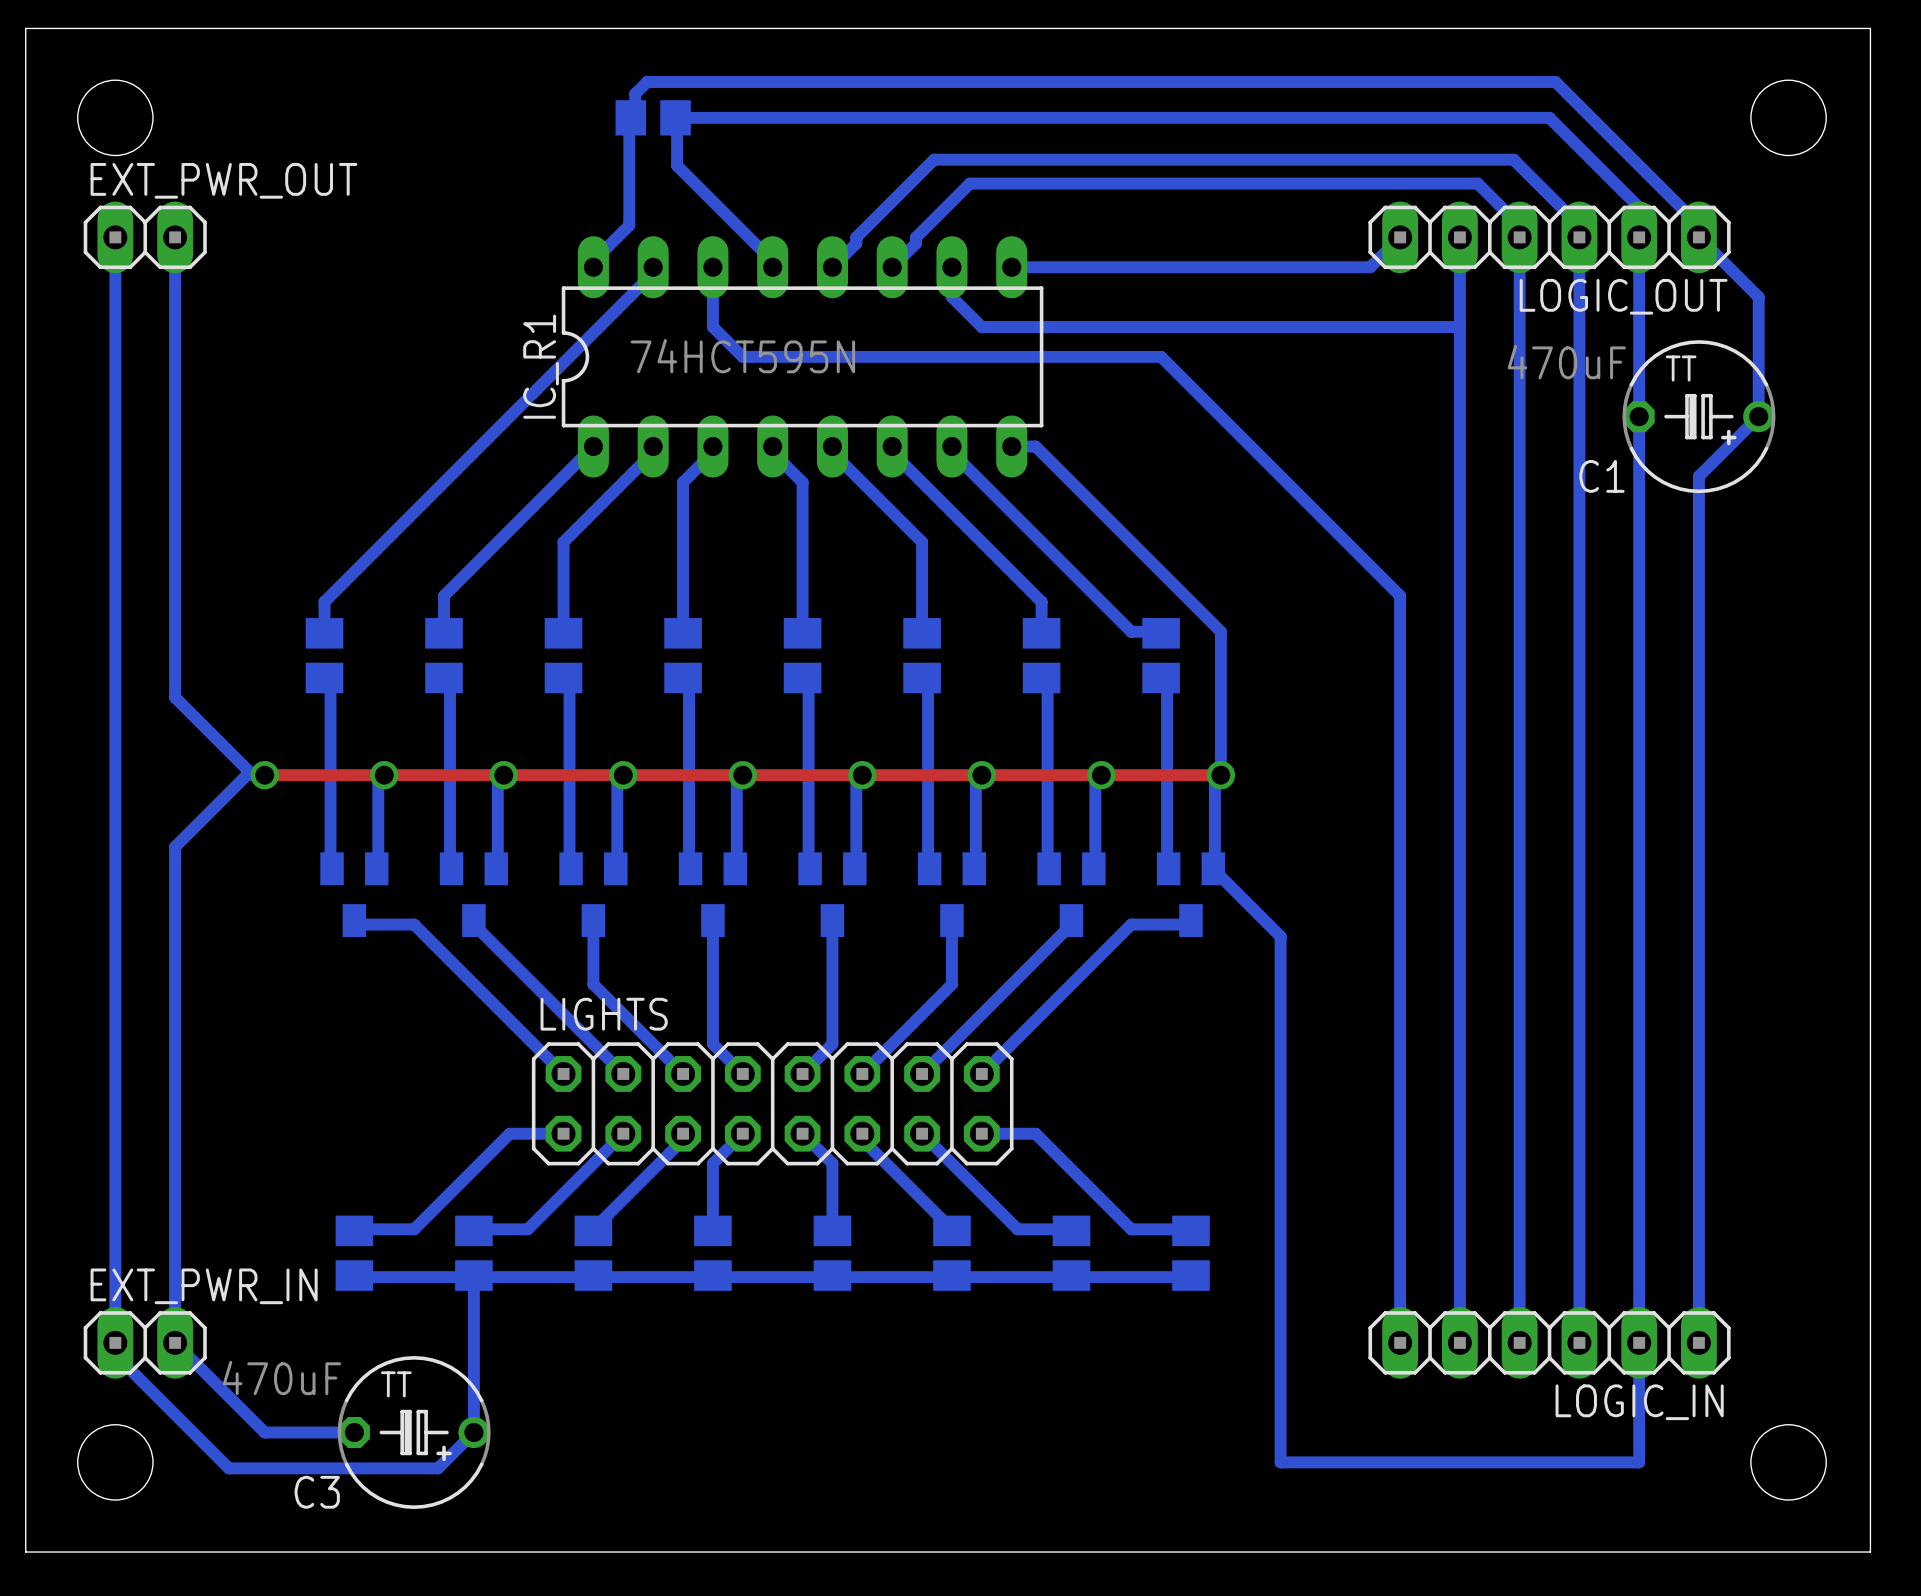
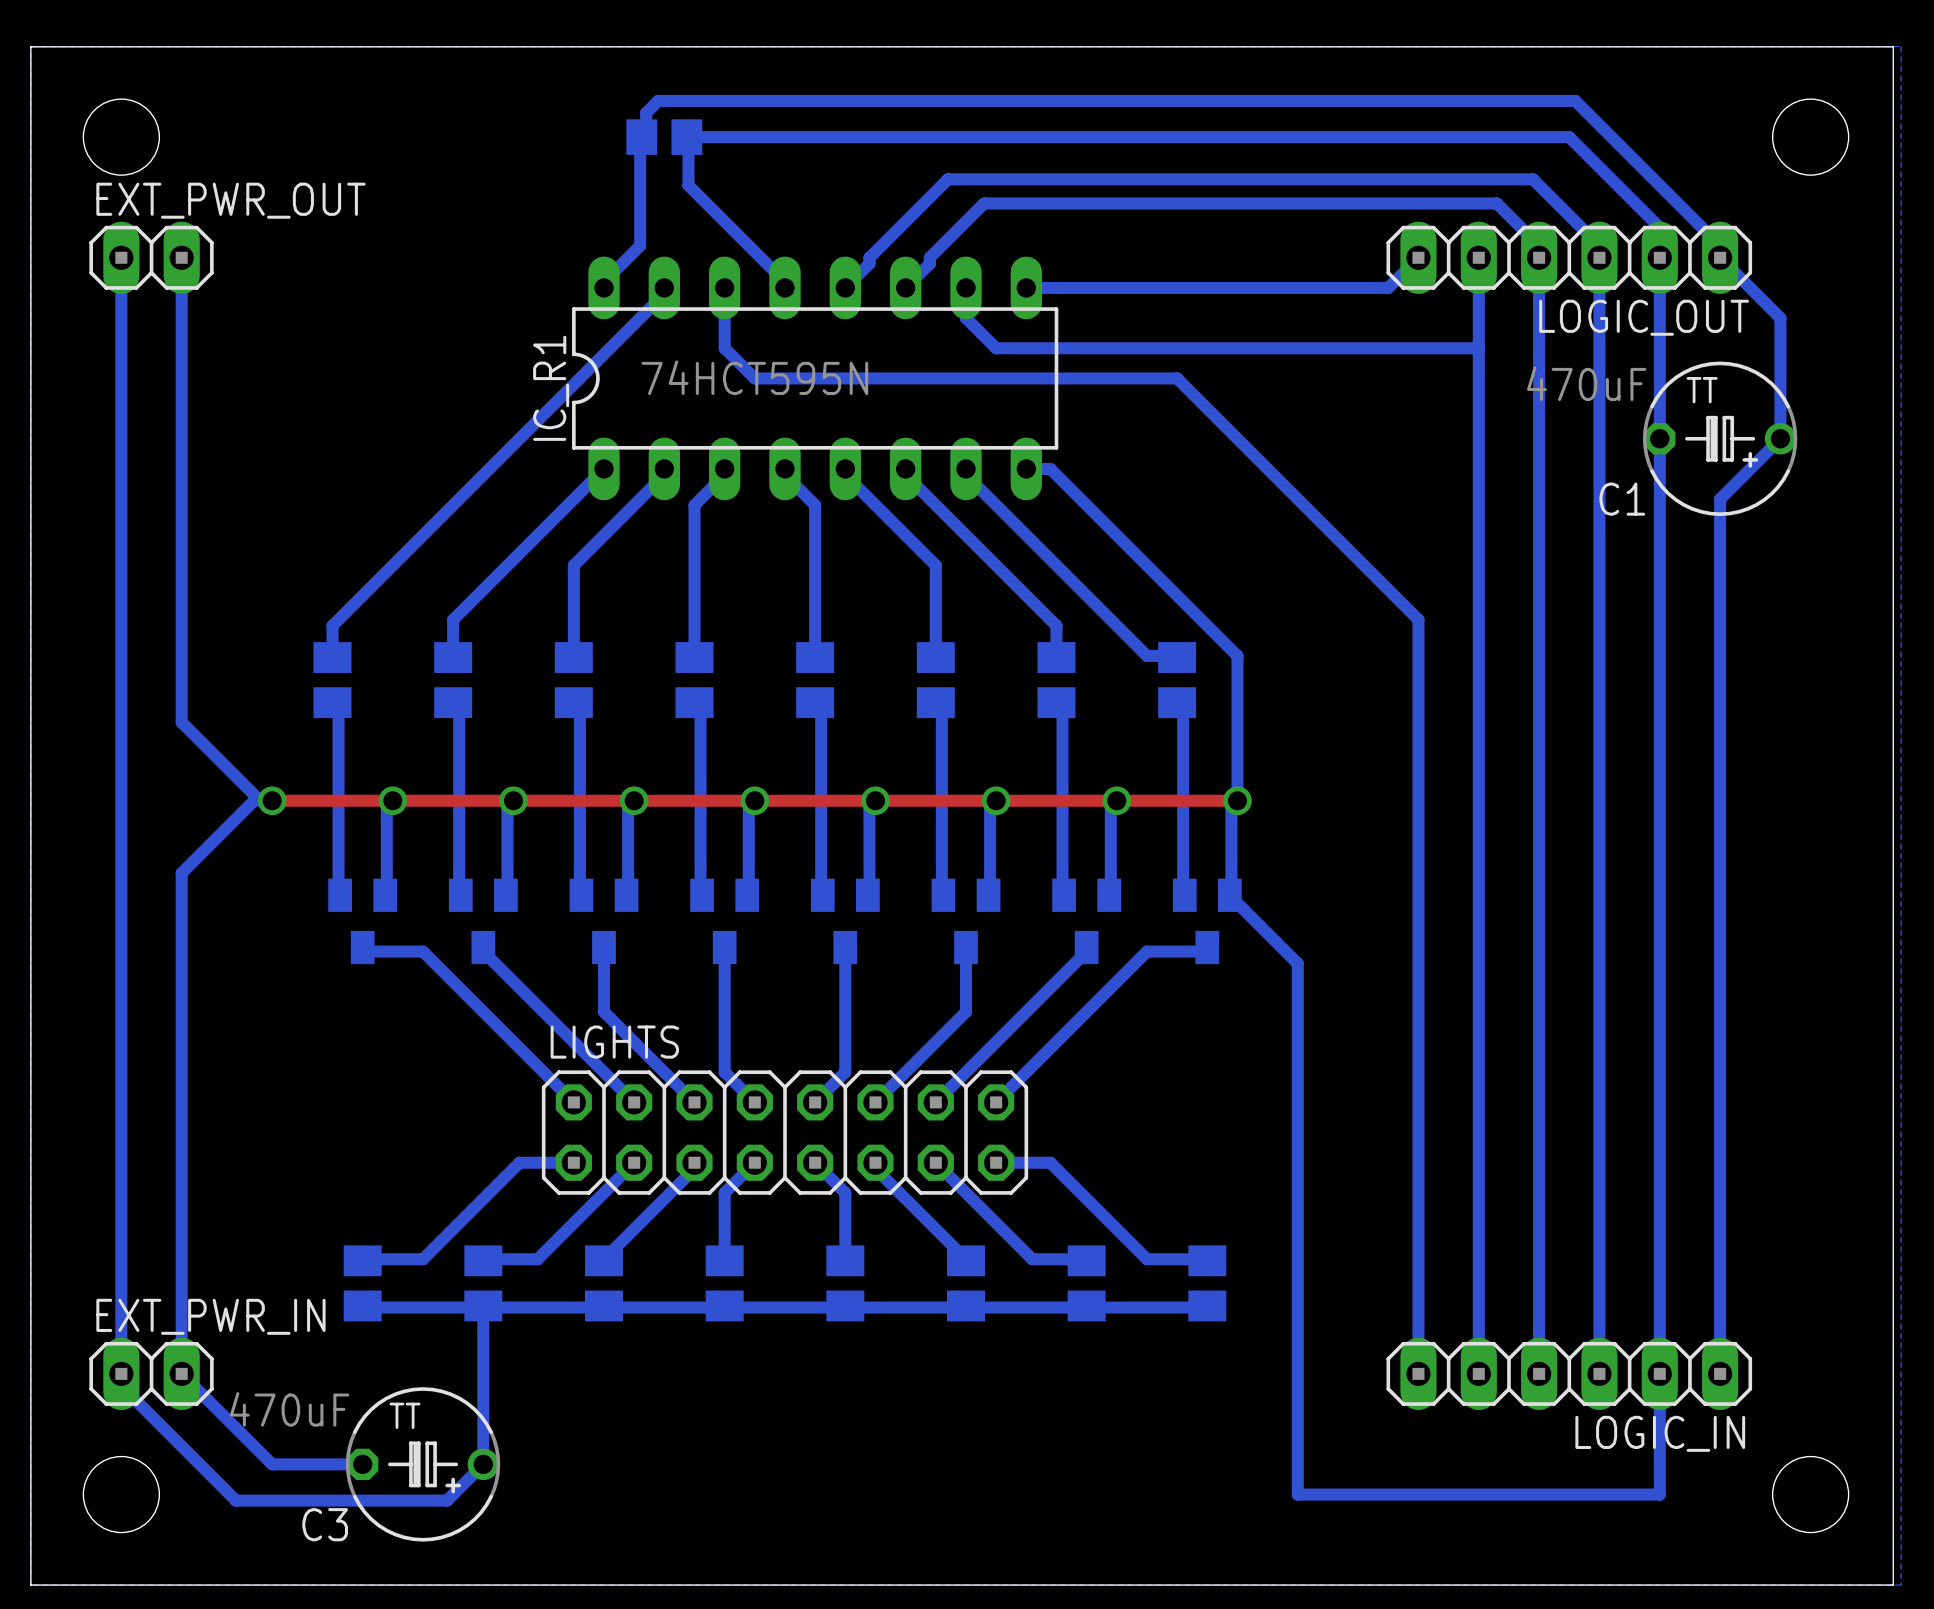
bottom zone outline: none -> (30, 46) (1901, 46) (1901, 1585) (30, 1585) (30, 46)

